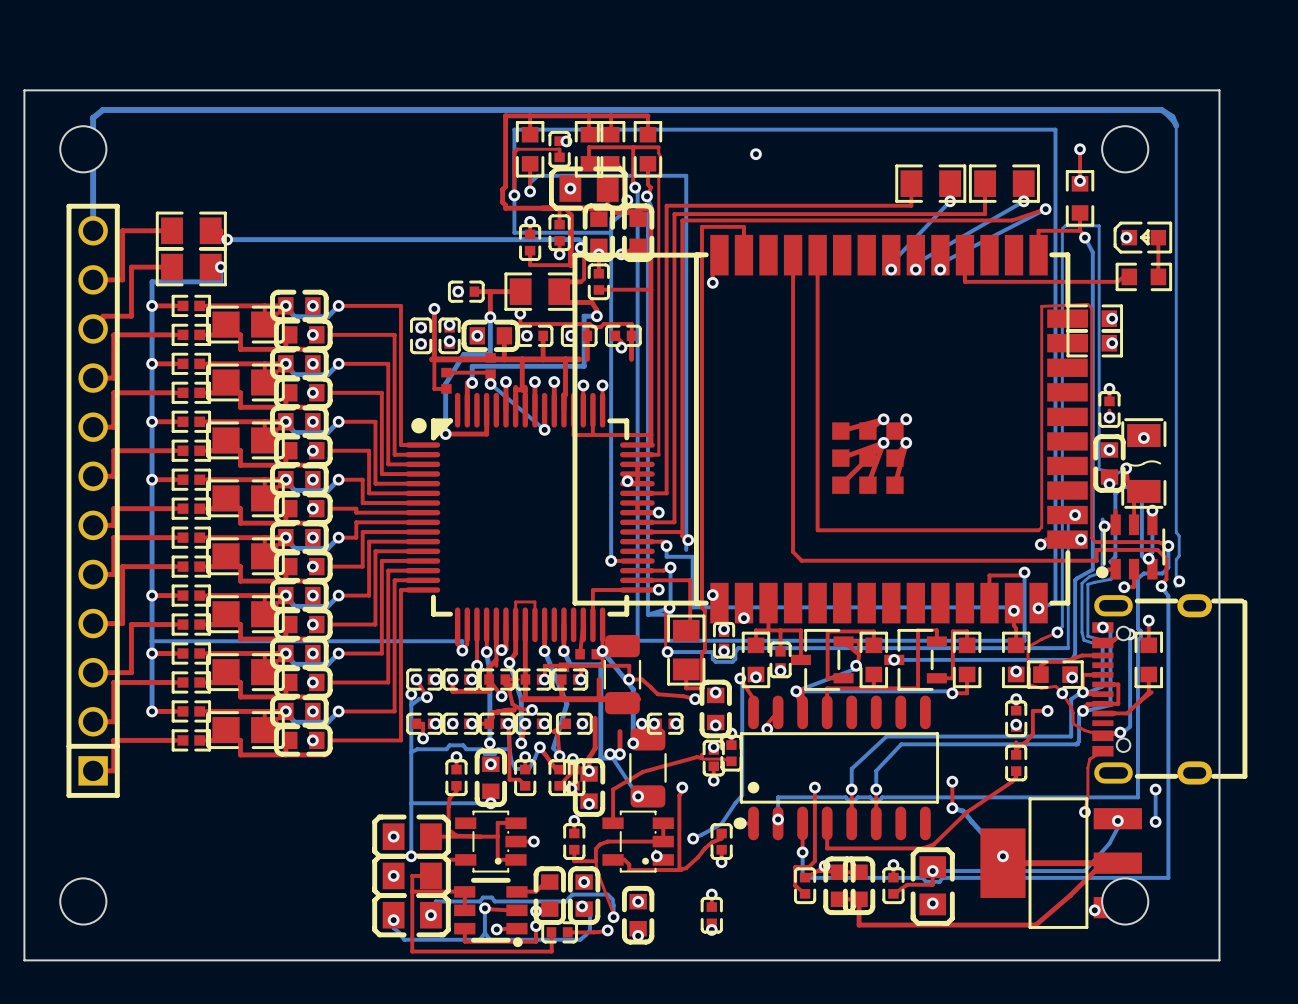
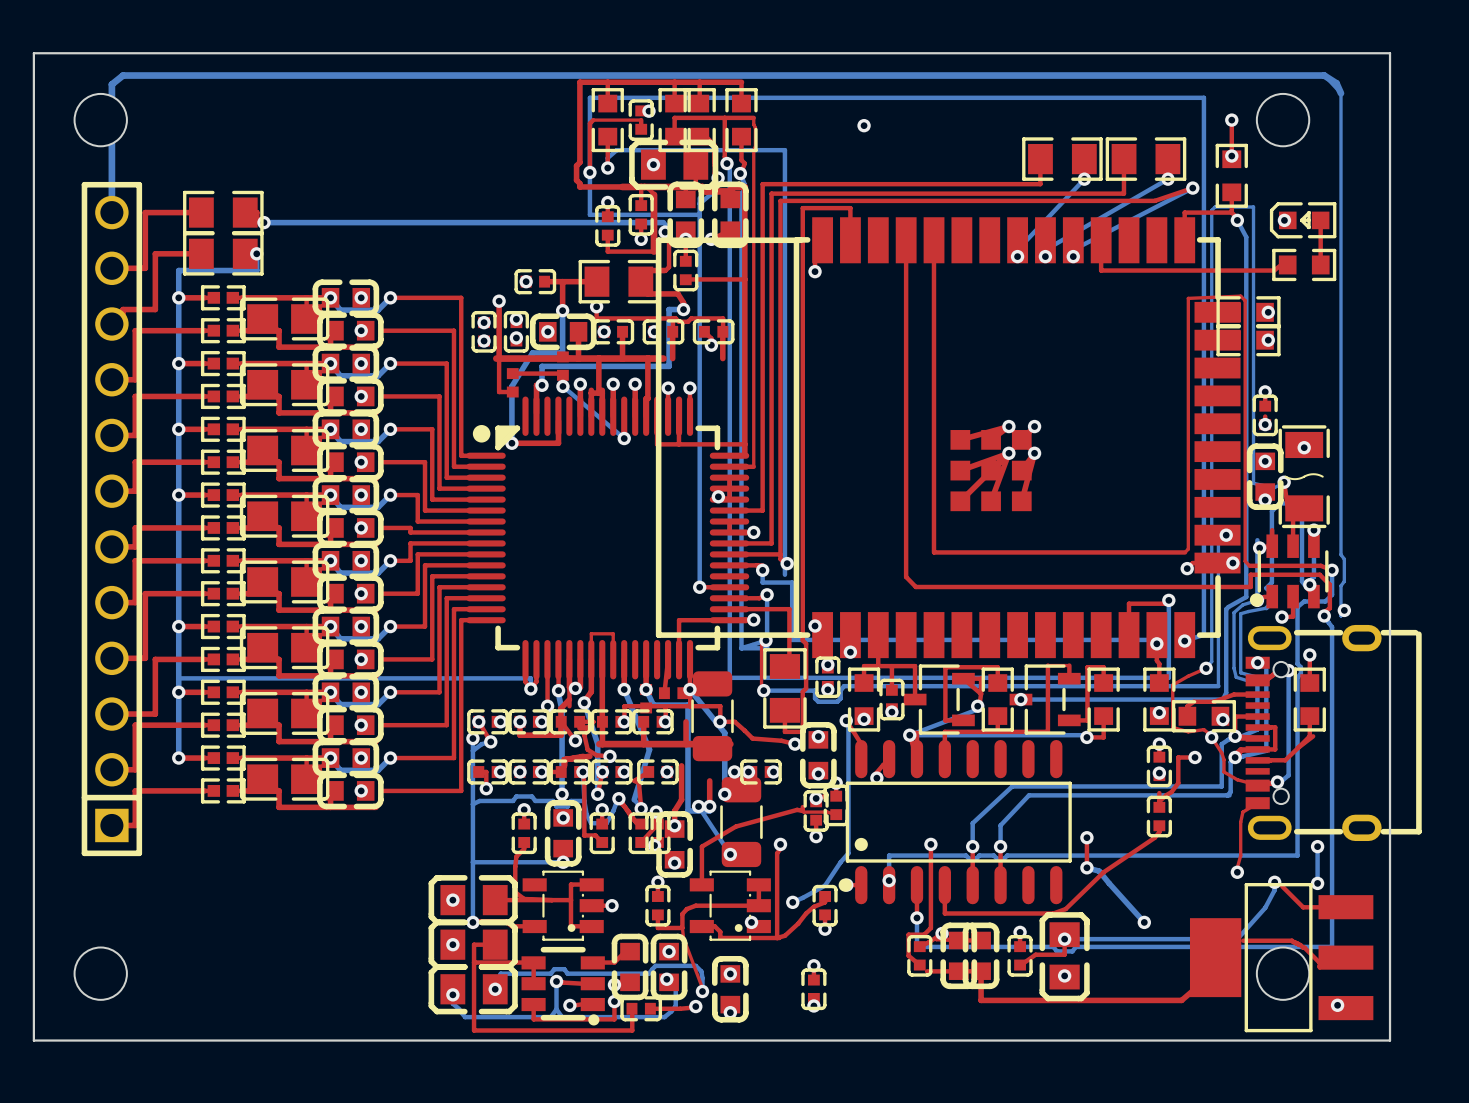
top track: none -> (1282, 886) (1303, 907) (1346, 907)
top track: (1019, 863) (1106, 863) (1094, 871) (1070, 895) -> none
part position: (1061, 863) -> (1281, 957)
top track: none -> (1243, 940) (1292, 940) (1304, 947) (1319, 963) (1319, 967) (1333, 957)
top track: none -> (927, 971) (959, 971)
via position: (1094, 910) -> (1337, 1005)

